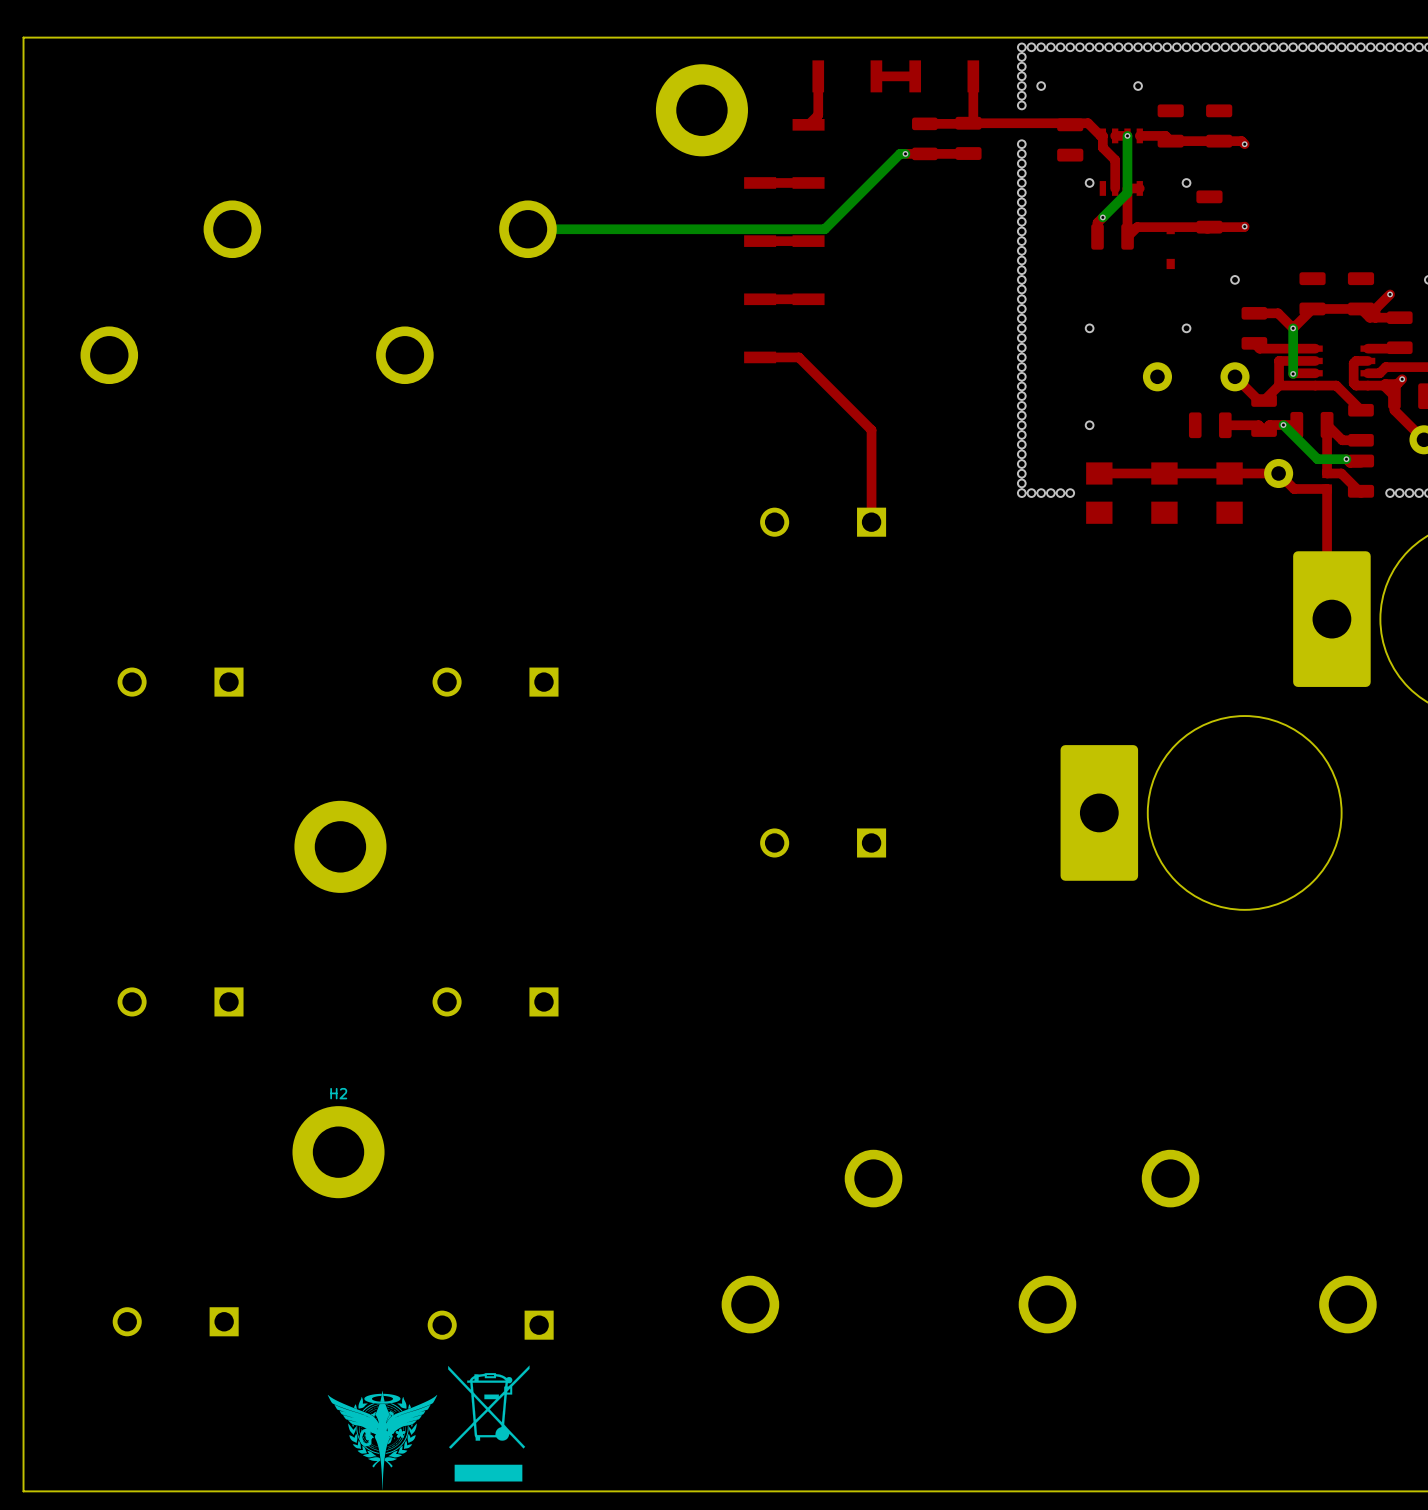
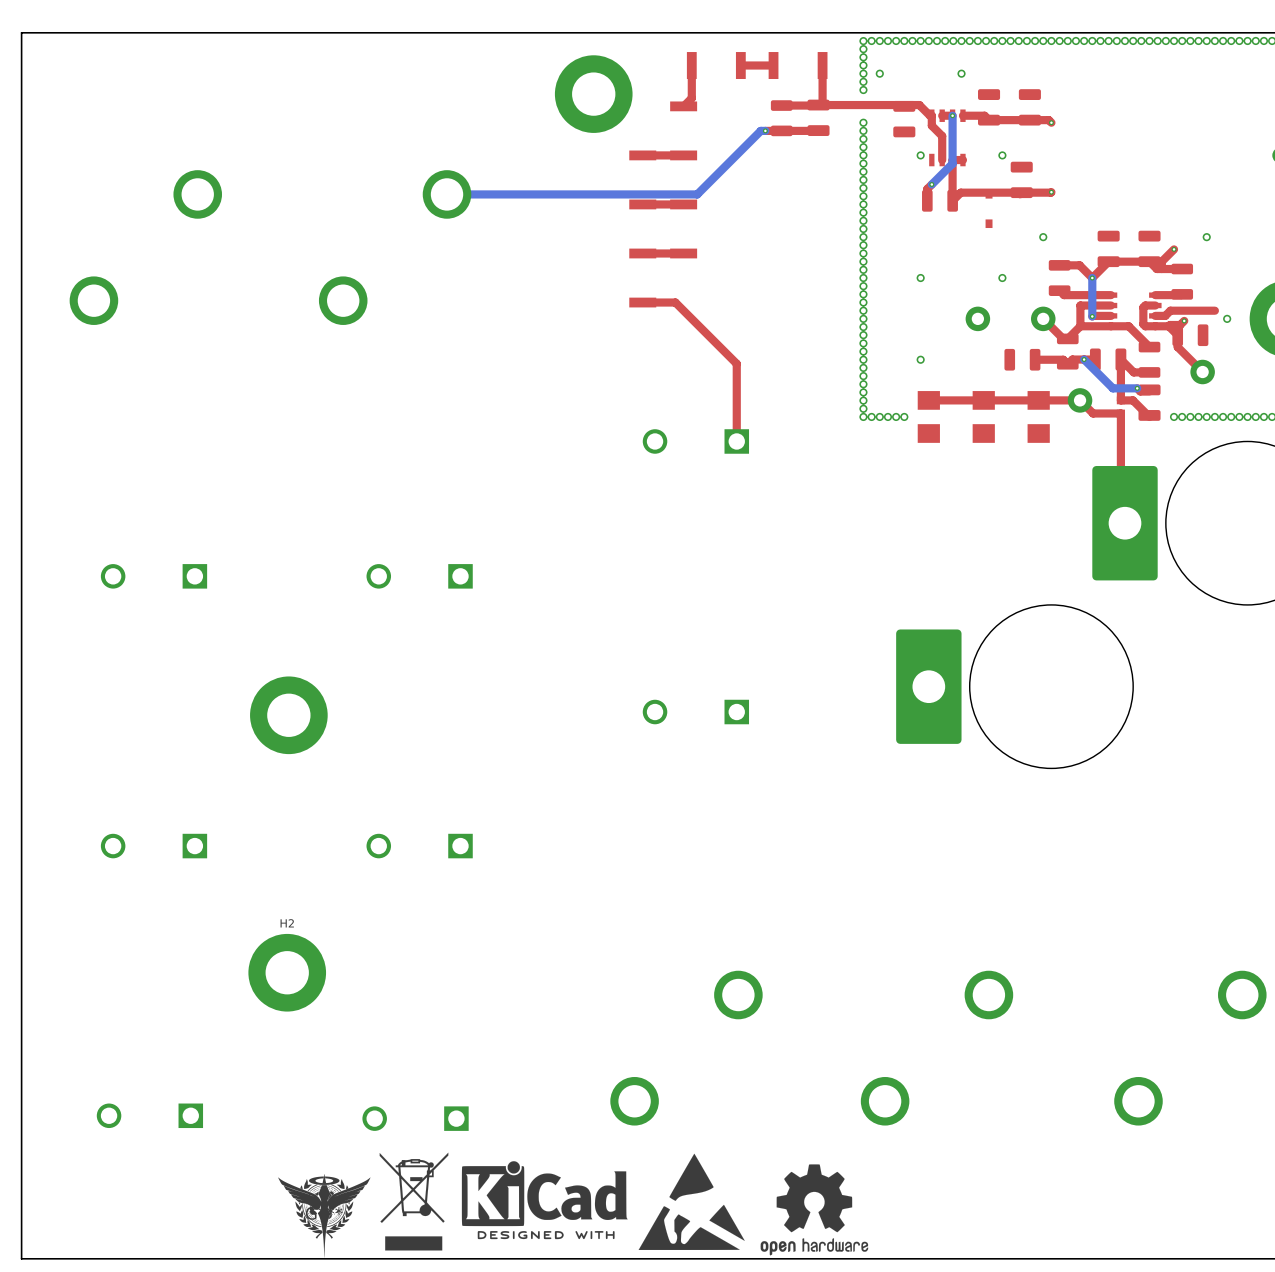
drawing: none -> [638, 1153, 745, 1250]
drawing: none -> [461, 1161, 628, 1240]
drawing: none -> [760, 1164, 869, 1256]

